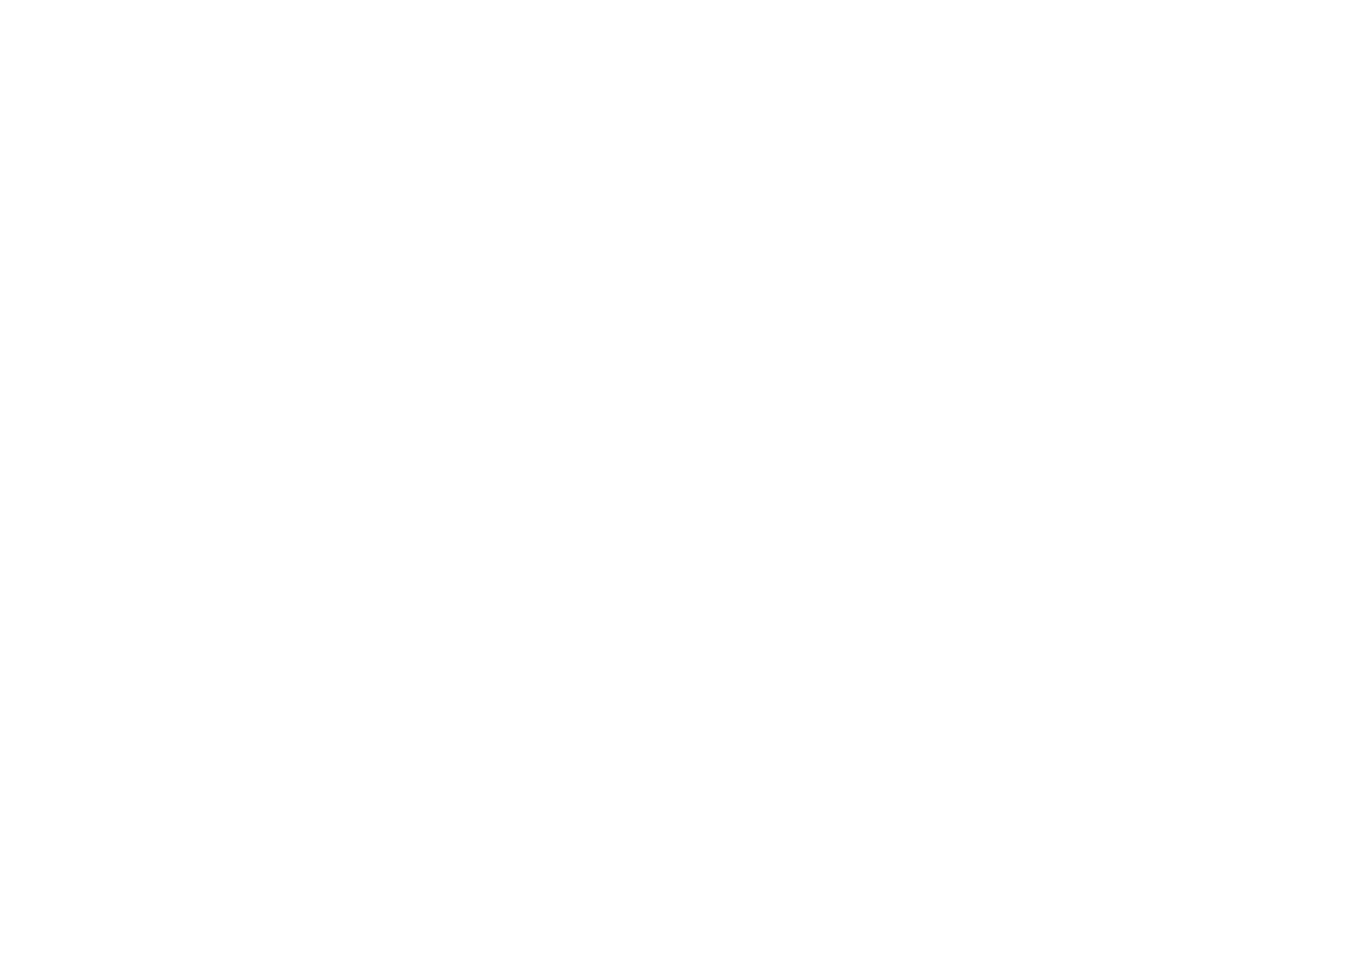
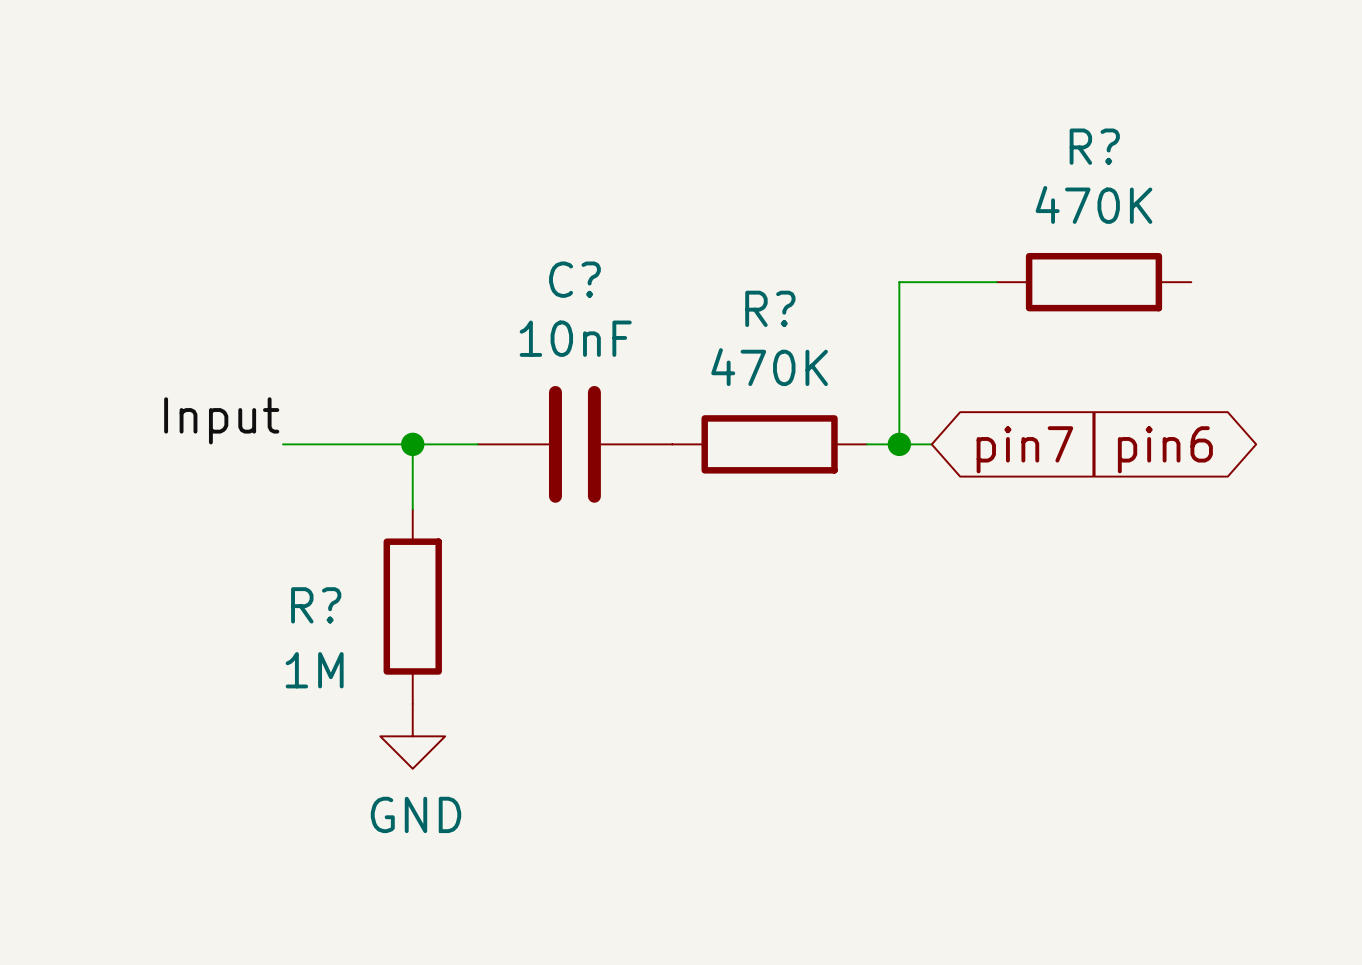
wire: none -> (996, 282) (899, 282) (899, 444)
R?: none -> 470K (1093, 282)
label: none -> Input (221, 420)
wire: none -> (282, 444) (477, 444)
wire: none -> (412, 444) (412, 509)
junction: none -> (412, 444)
C?: none -> 10nF (574, 444)
R?: none -> 470K (769, 444)
wire: none -> (866, 444) (931, 444)
junction: none -> (899, 444)
global label: none -> pin7 (1024, 449)
global label: none -> pin6 (1165, 449)
R?: none -> 1M (412, 606)
power symbol: none -> GND (412, 736)

